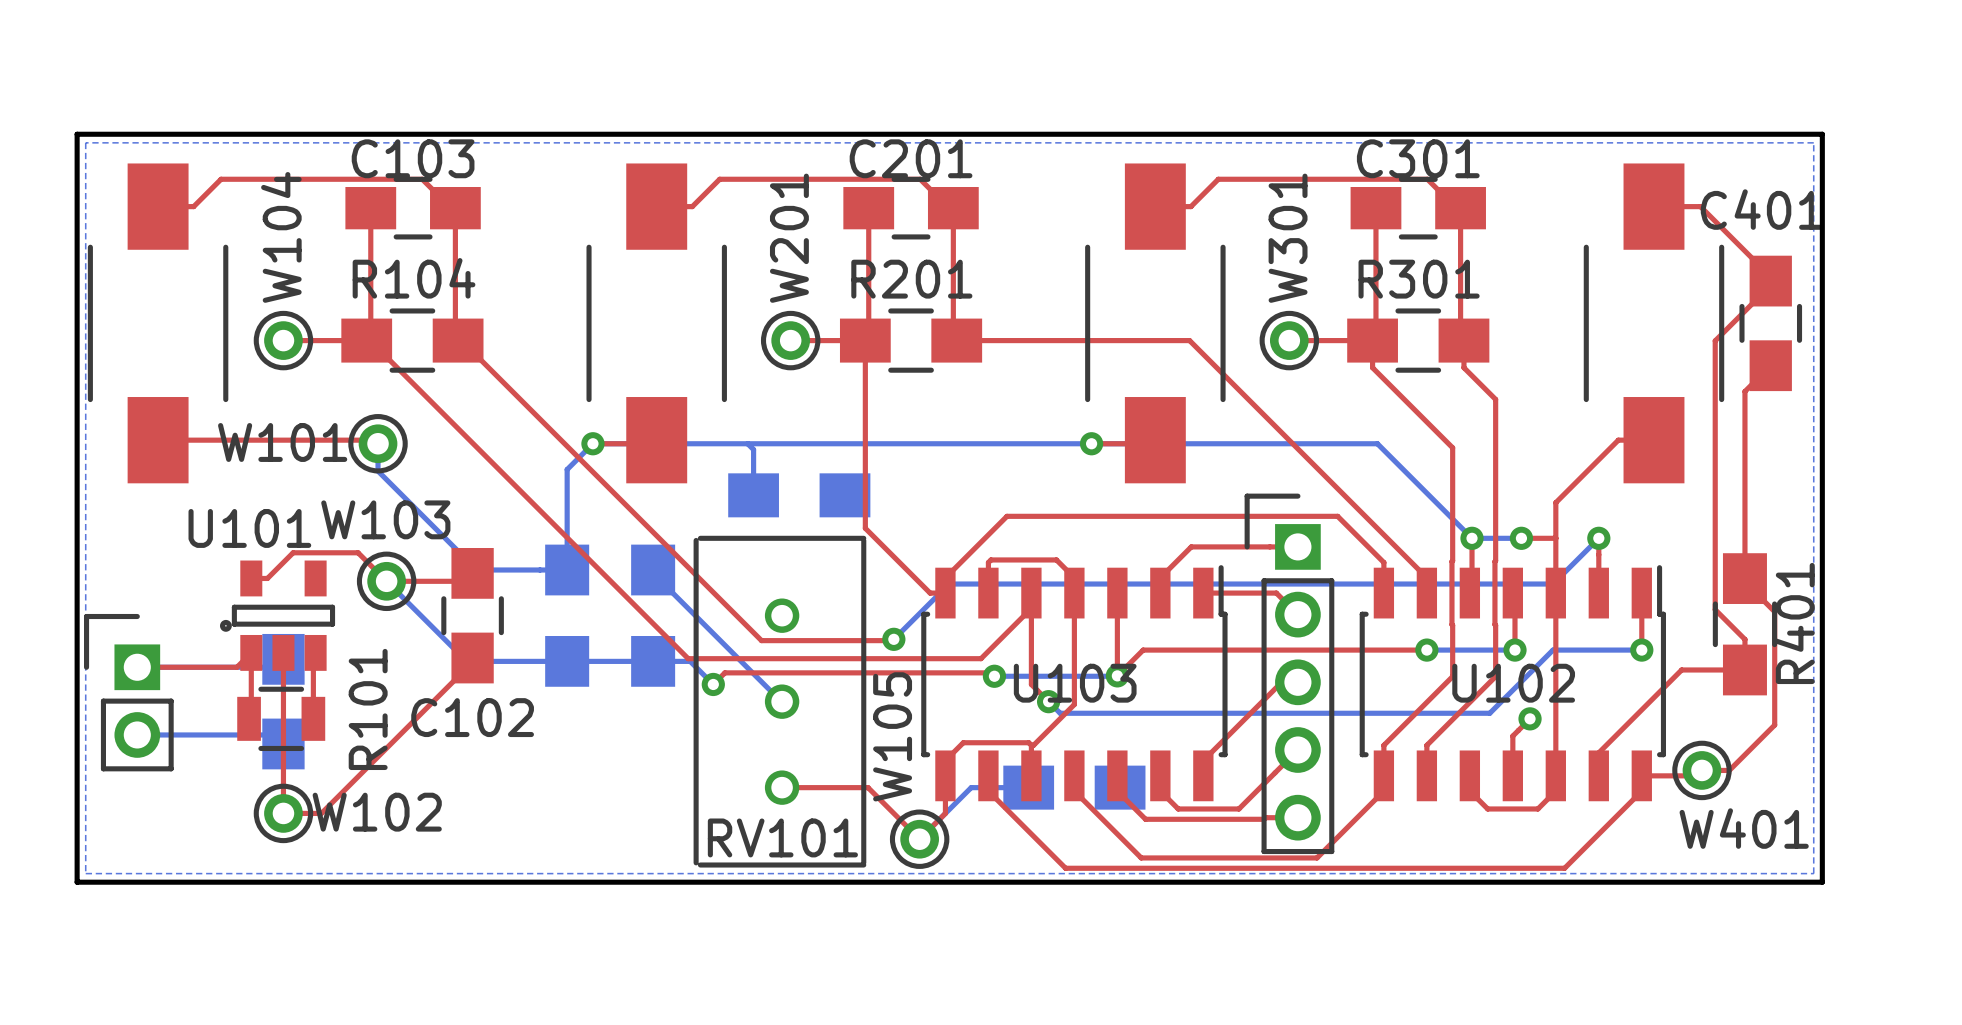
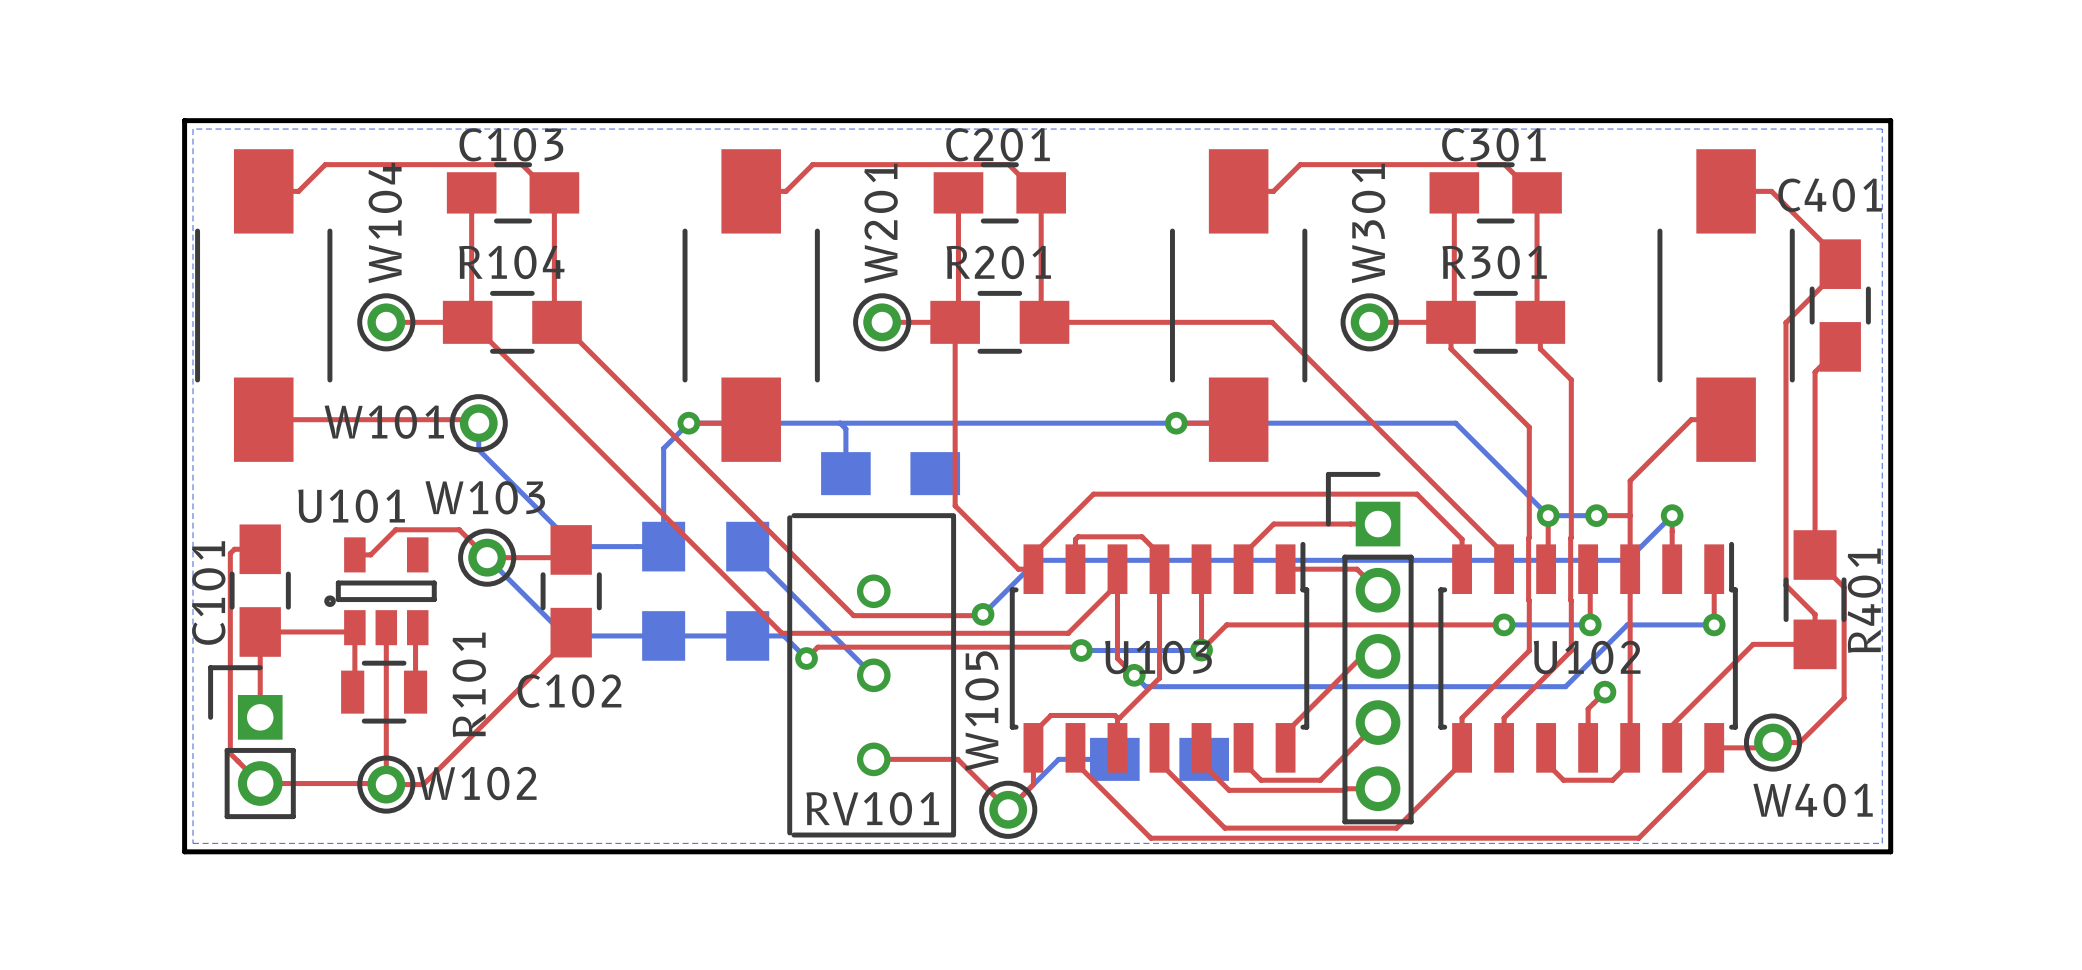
top track: none -> (260, 549) (234, 549) (230, 553) (230, 753) (260, 783) (385, 783)
top track: (246, 657) (236, 667) (137, 667) -> (350, 631) (260, 631) (260, 717)
part position: (128, 692) -> (251, 742)
C101 side: bottom (283, 701) -> top (260, 590)
bottom track: (137, 734) (274, 734) (283, 743) -> none

